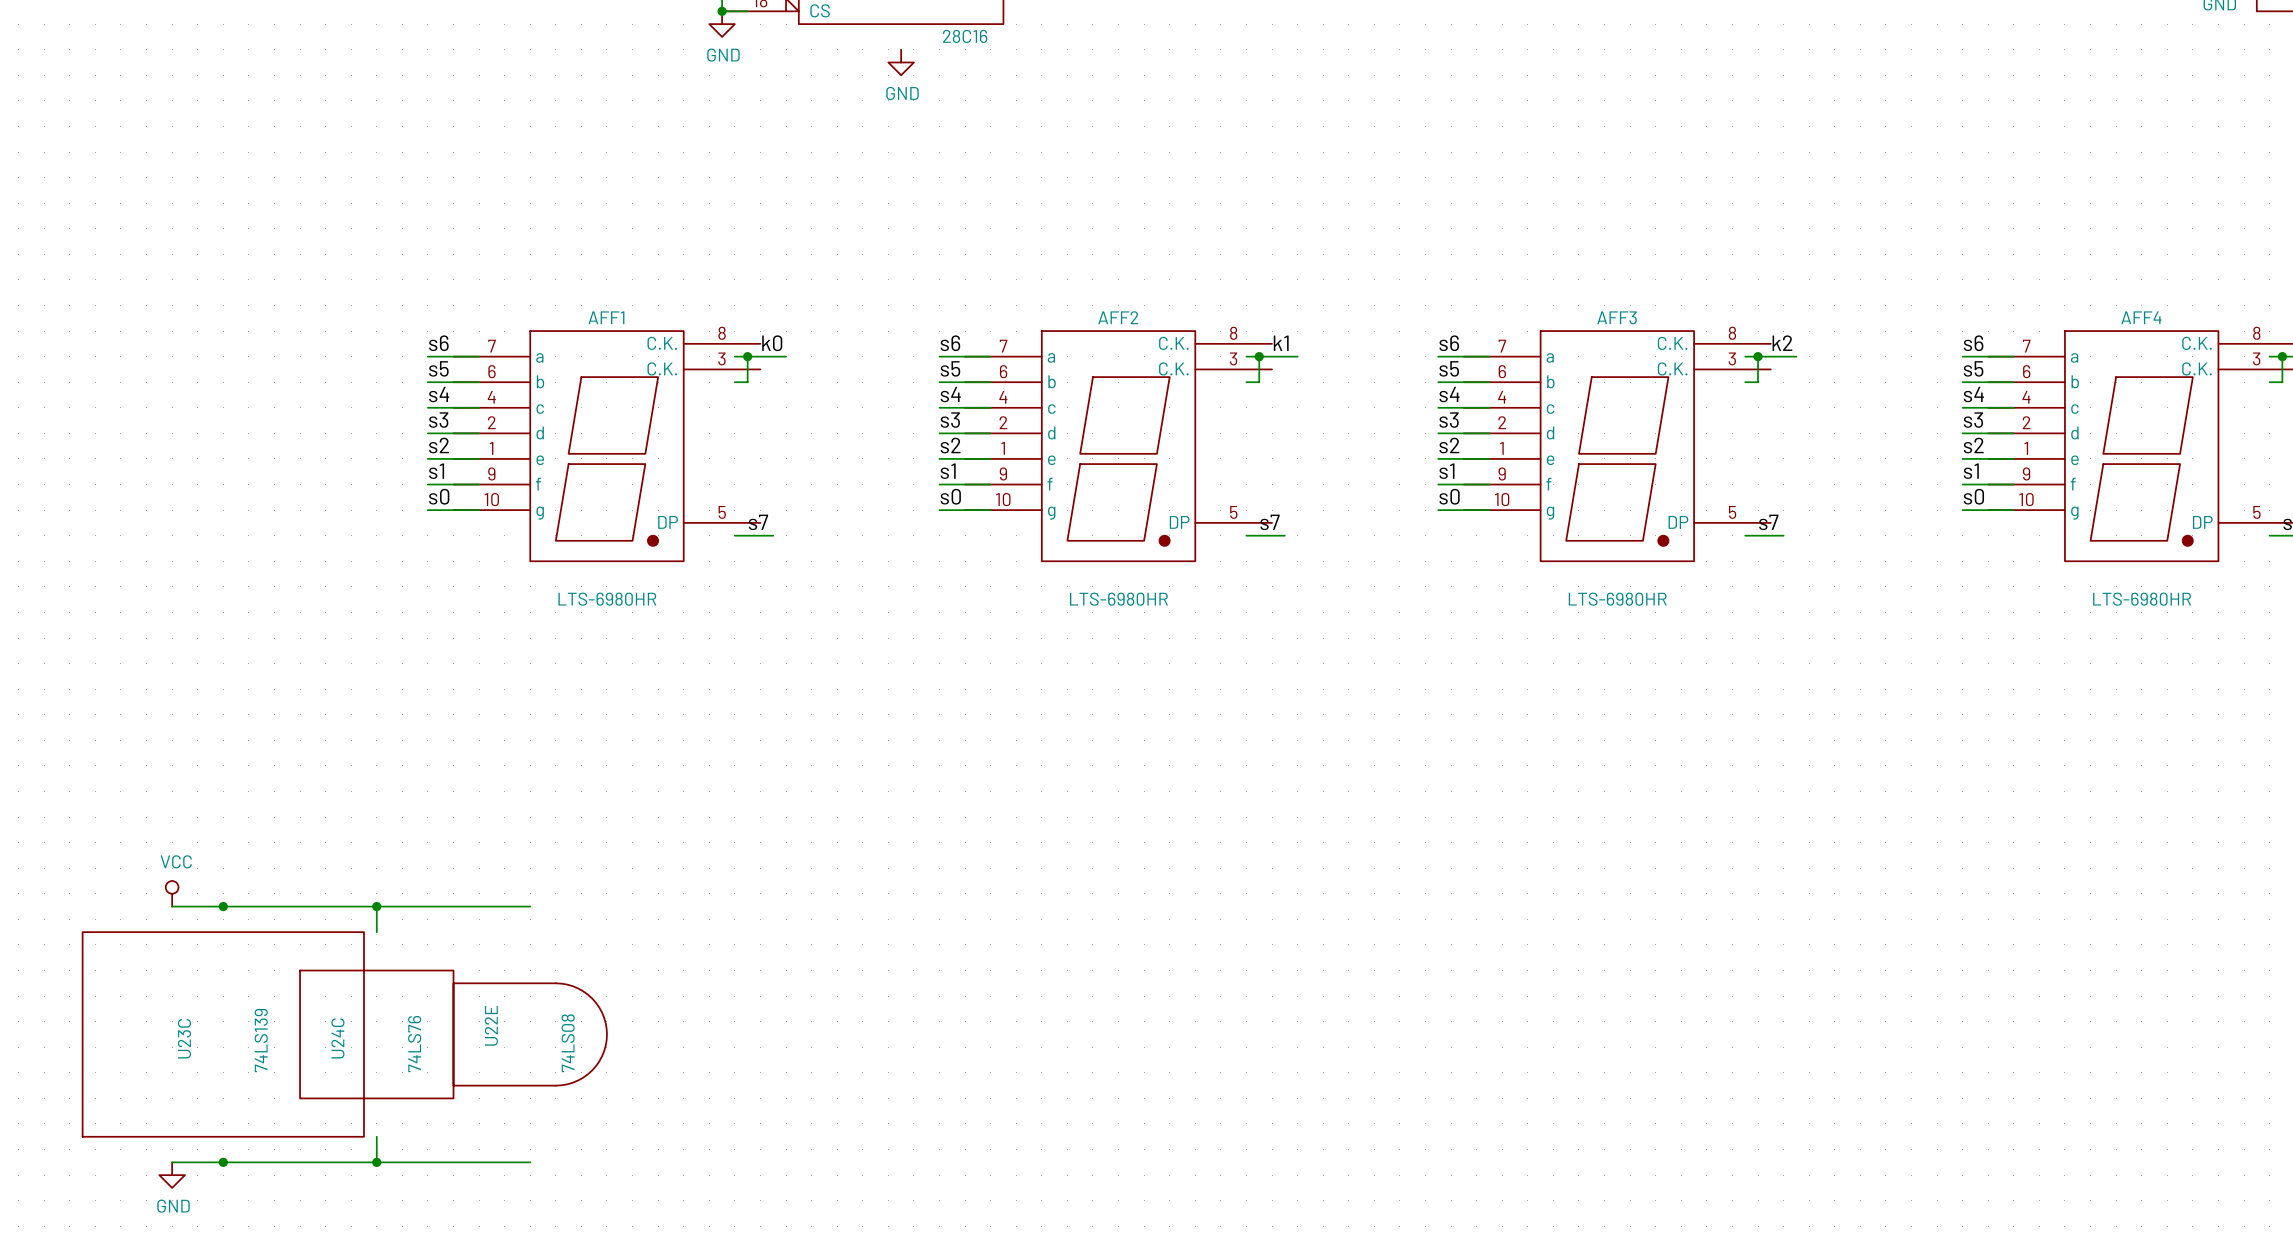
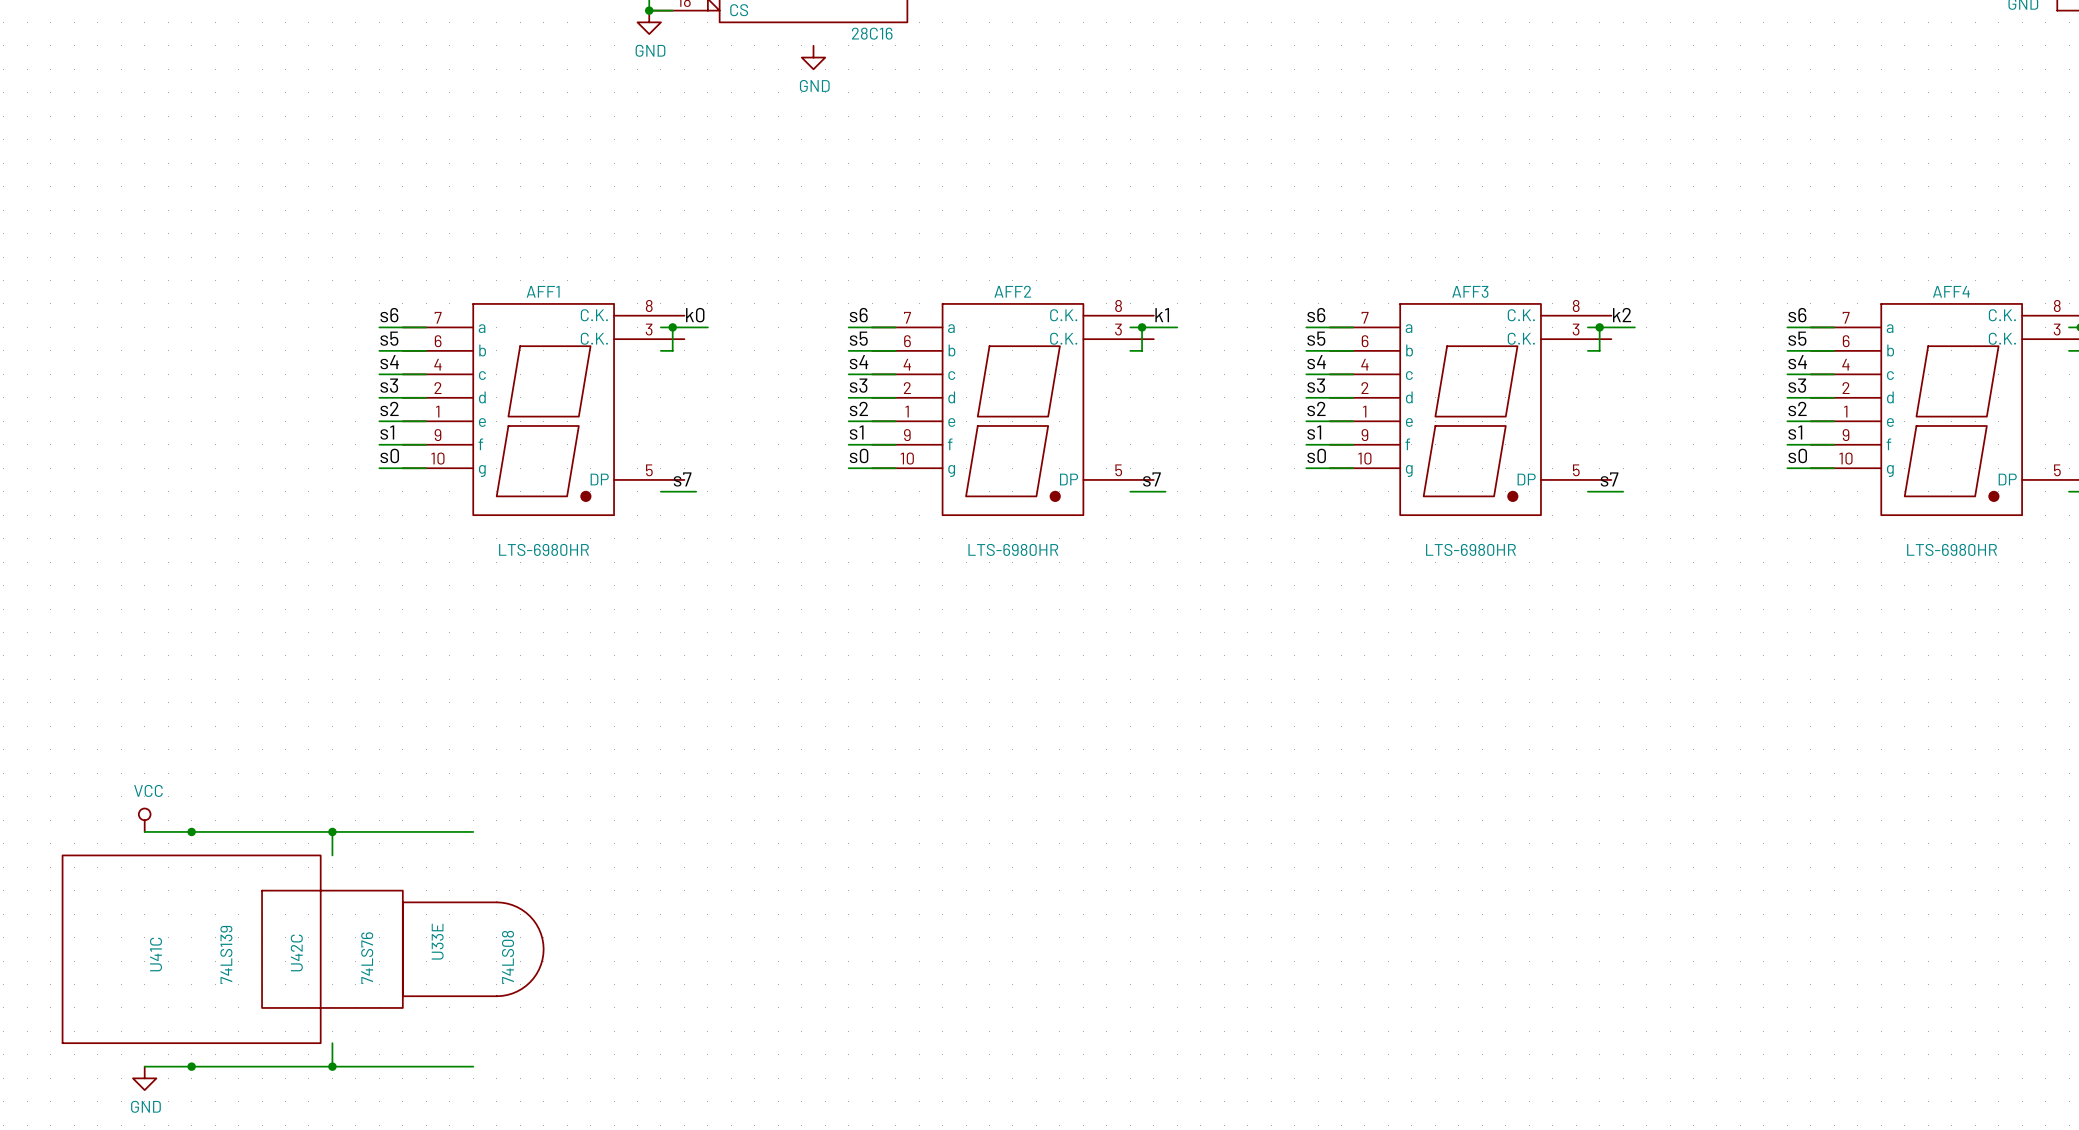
U22E name: U22E (491, 1025) -> U33E (437, 941)
U23C name: U23C (184, 1038) -> U41C (156, 954)
U24C name: U24C (337, 1038) -> U42C (296, 952)

